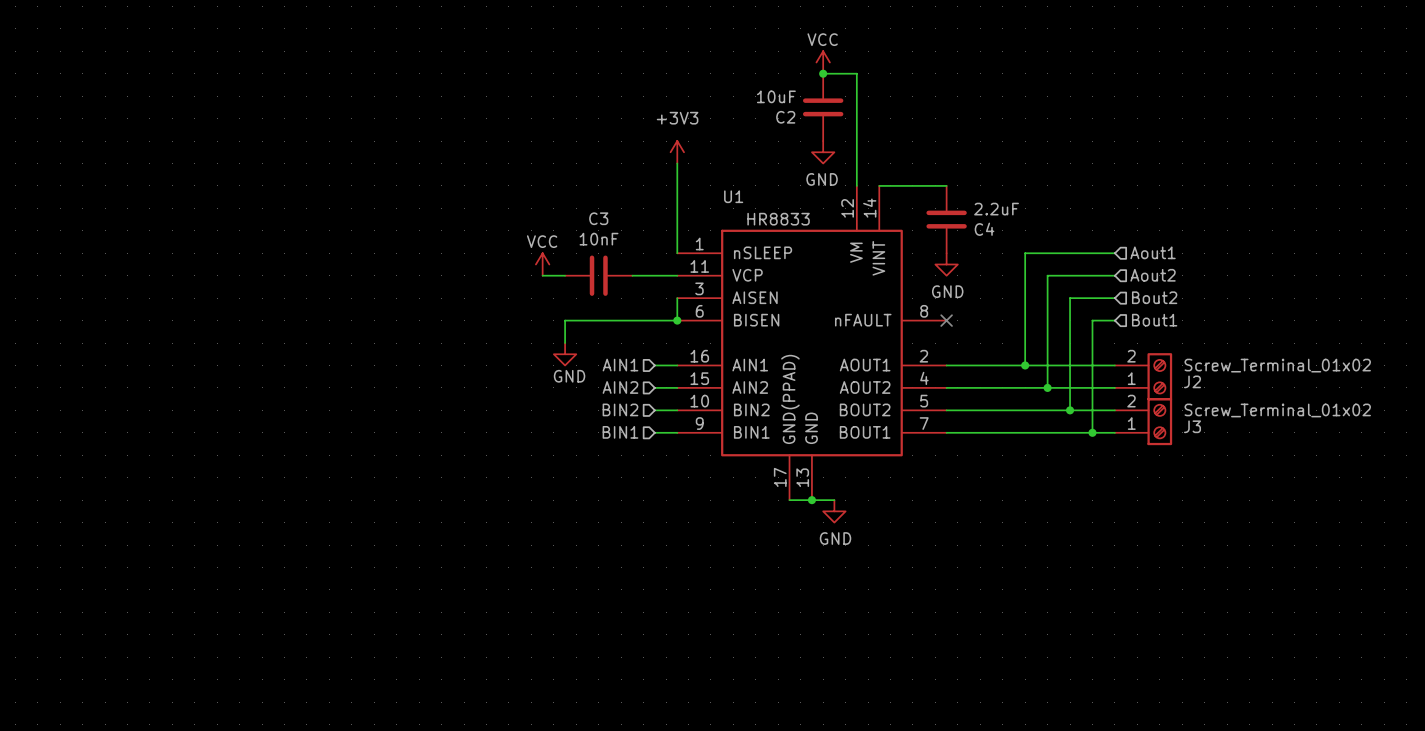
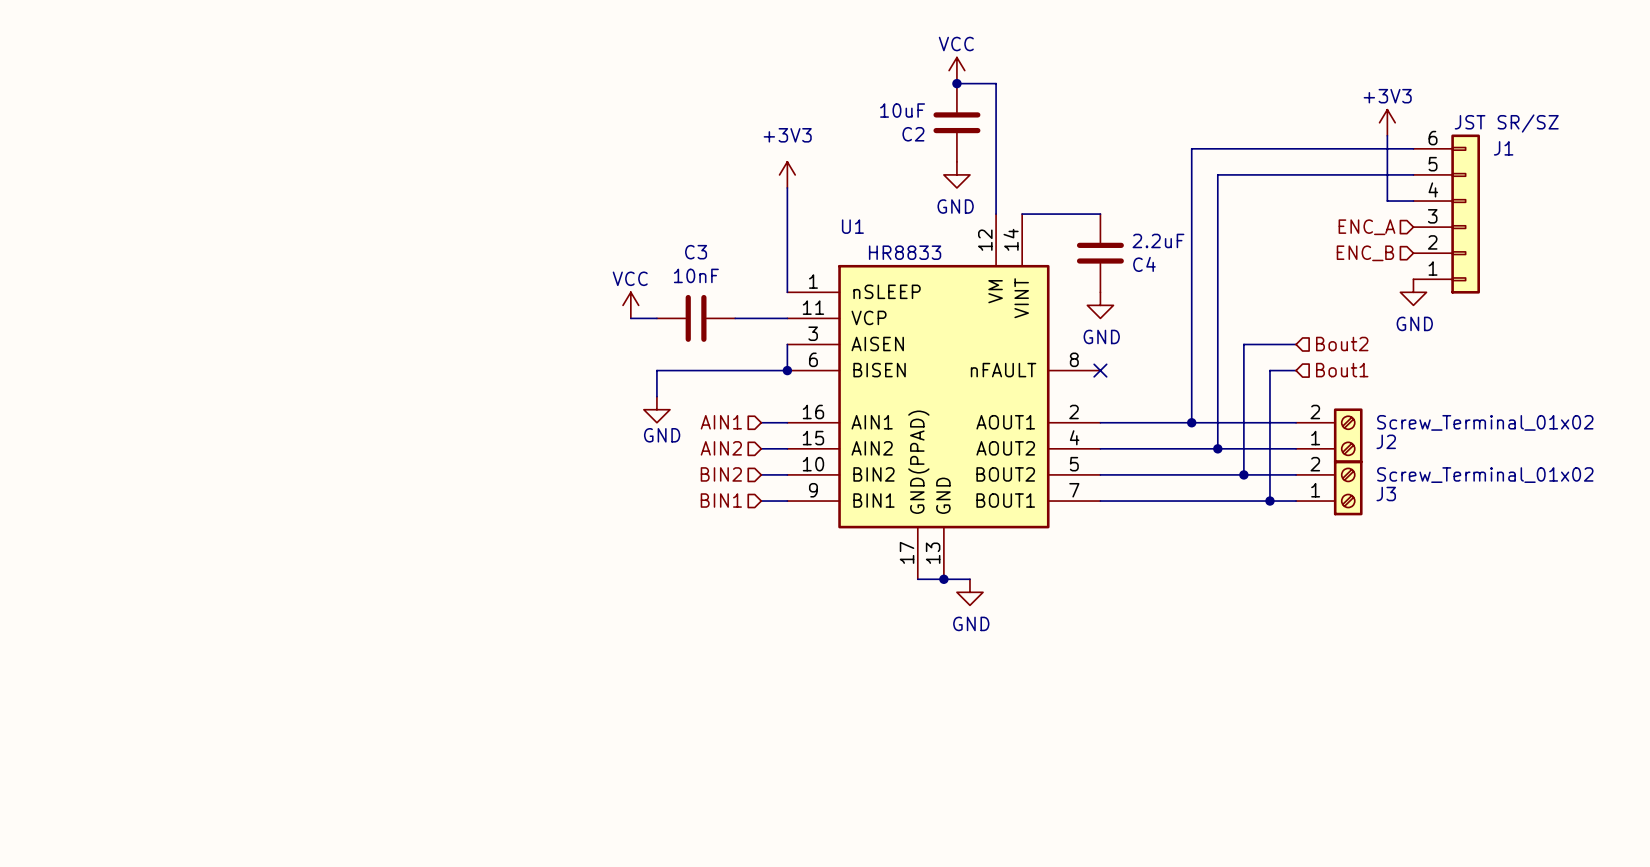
power symbol: none -> +3V3 (1387, 122)
wire: none -> (1387, 135) (1387, 201) (1413, 201)
J1: none -> JST SR/SZ (1446, 214)
hierarchical label: none -> ENC_A (1366, 227)
hierarchical label: none -> ENC_B (1365, 253)
hierarchical label: Aout1 (1153, 252) -> none
wire: (1025, 253) (1114, 253) -> (1191, 292) (1191, 148) (1413, 148)
power symbol: none -> GND (1413, 292)
wire: (1047, 275) (1114, 275) -> (1217, 318) (1217, 174) (1413, 174)
hierarchical label: Aout2 (1153, 275) -> none

